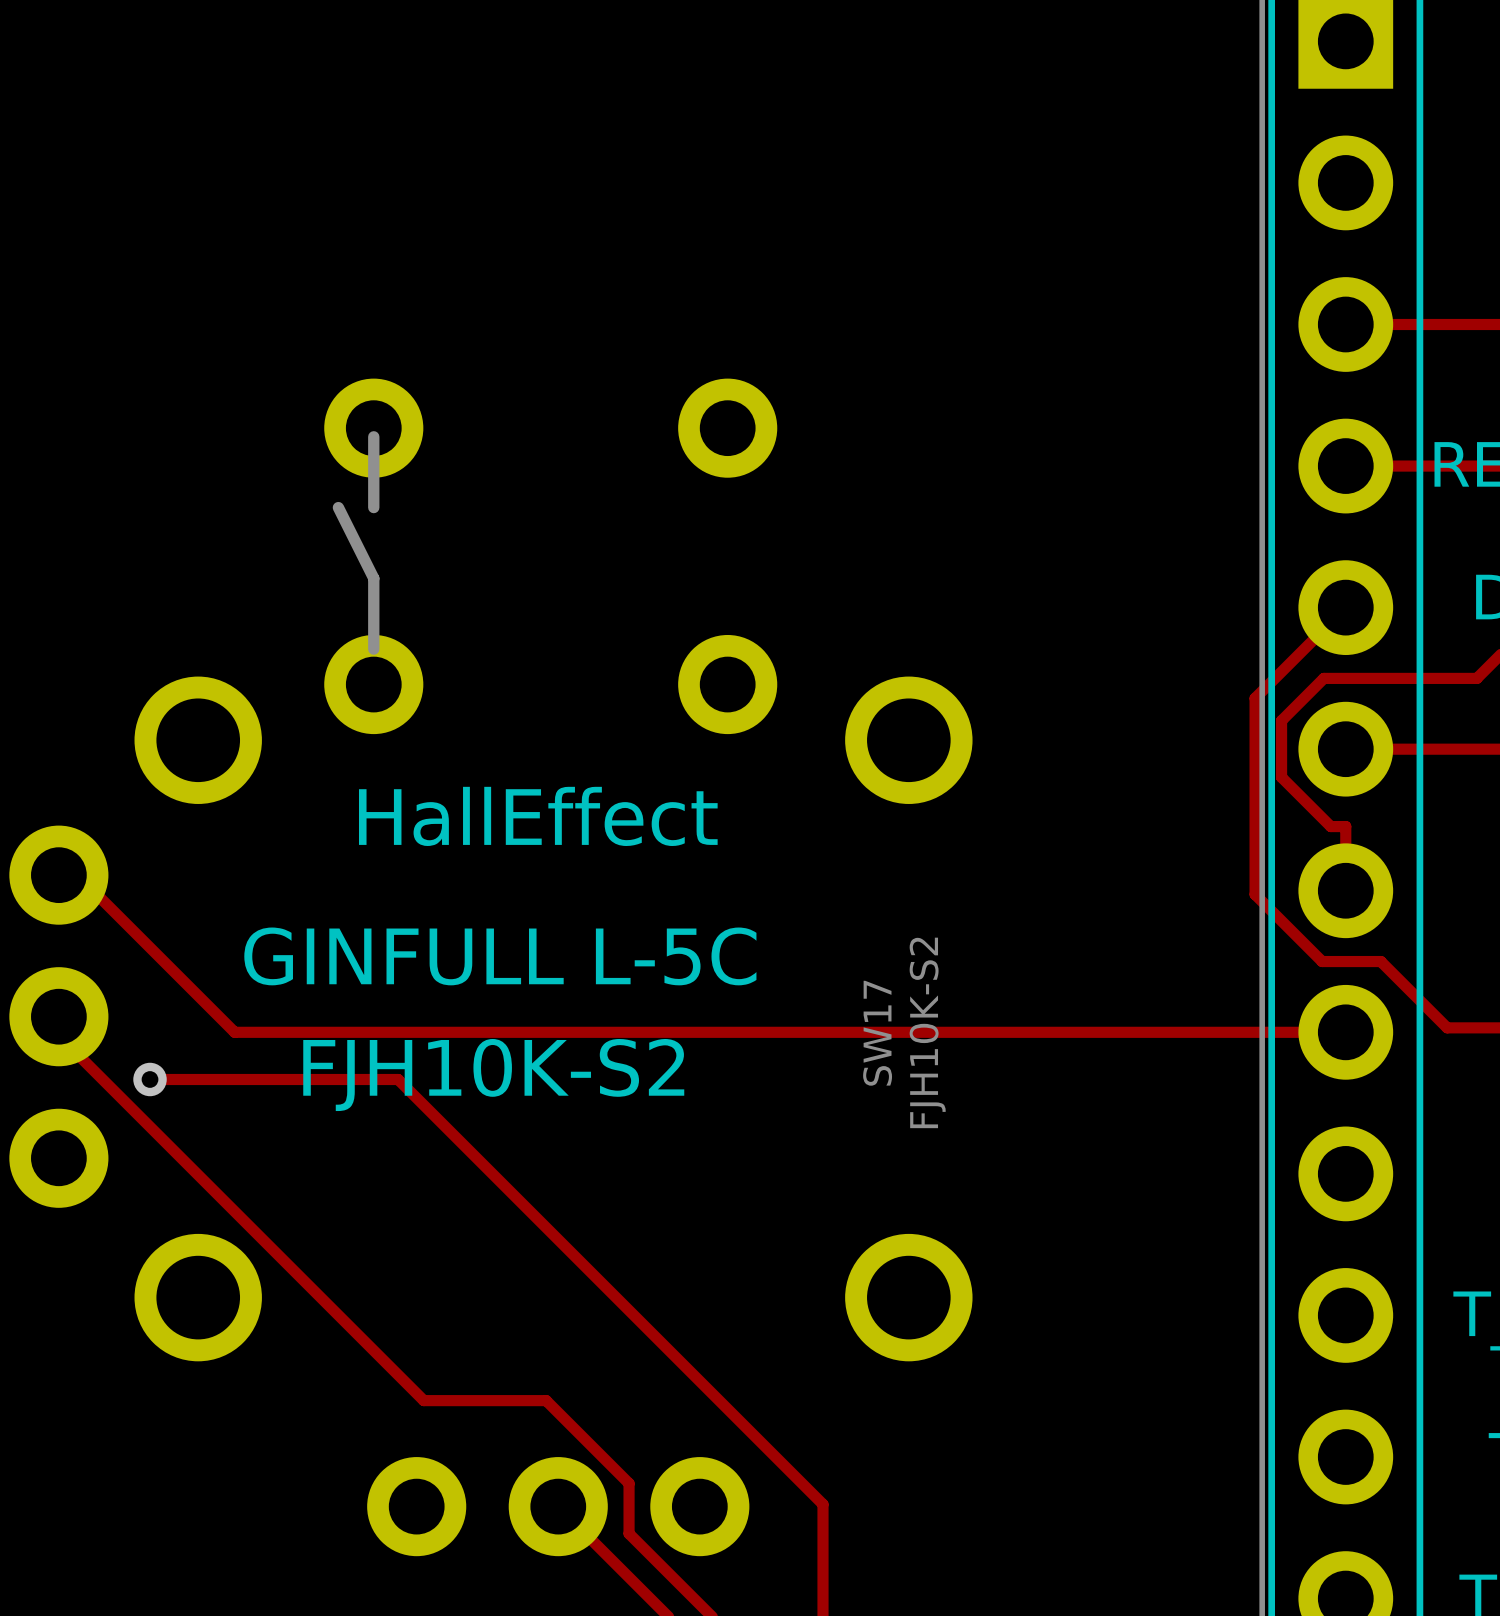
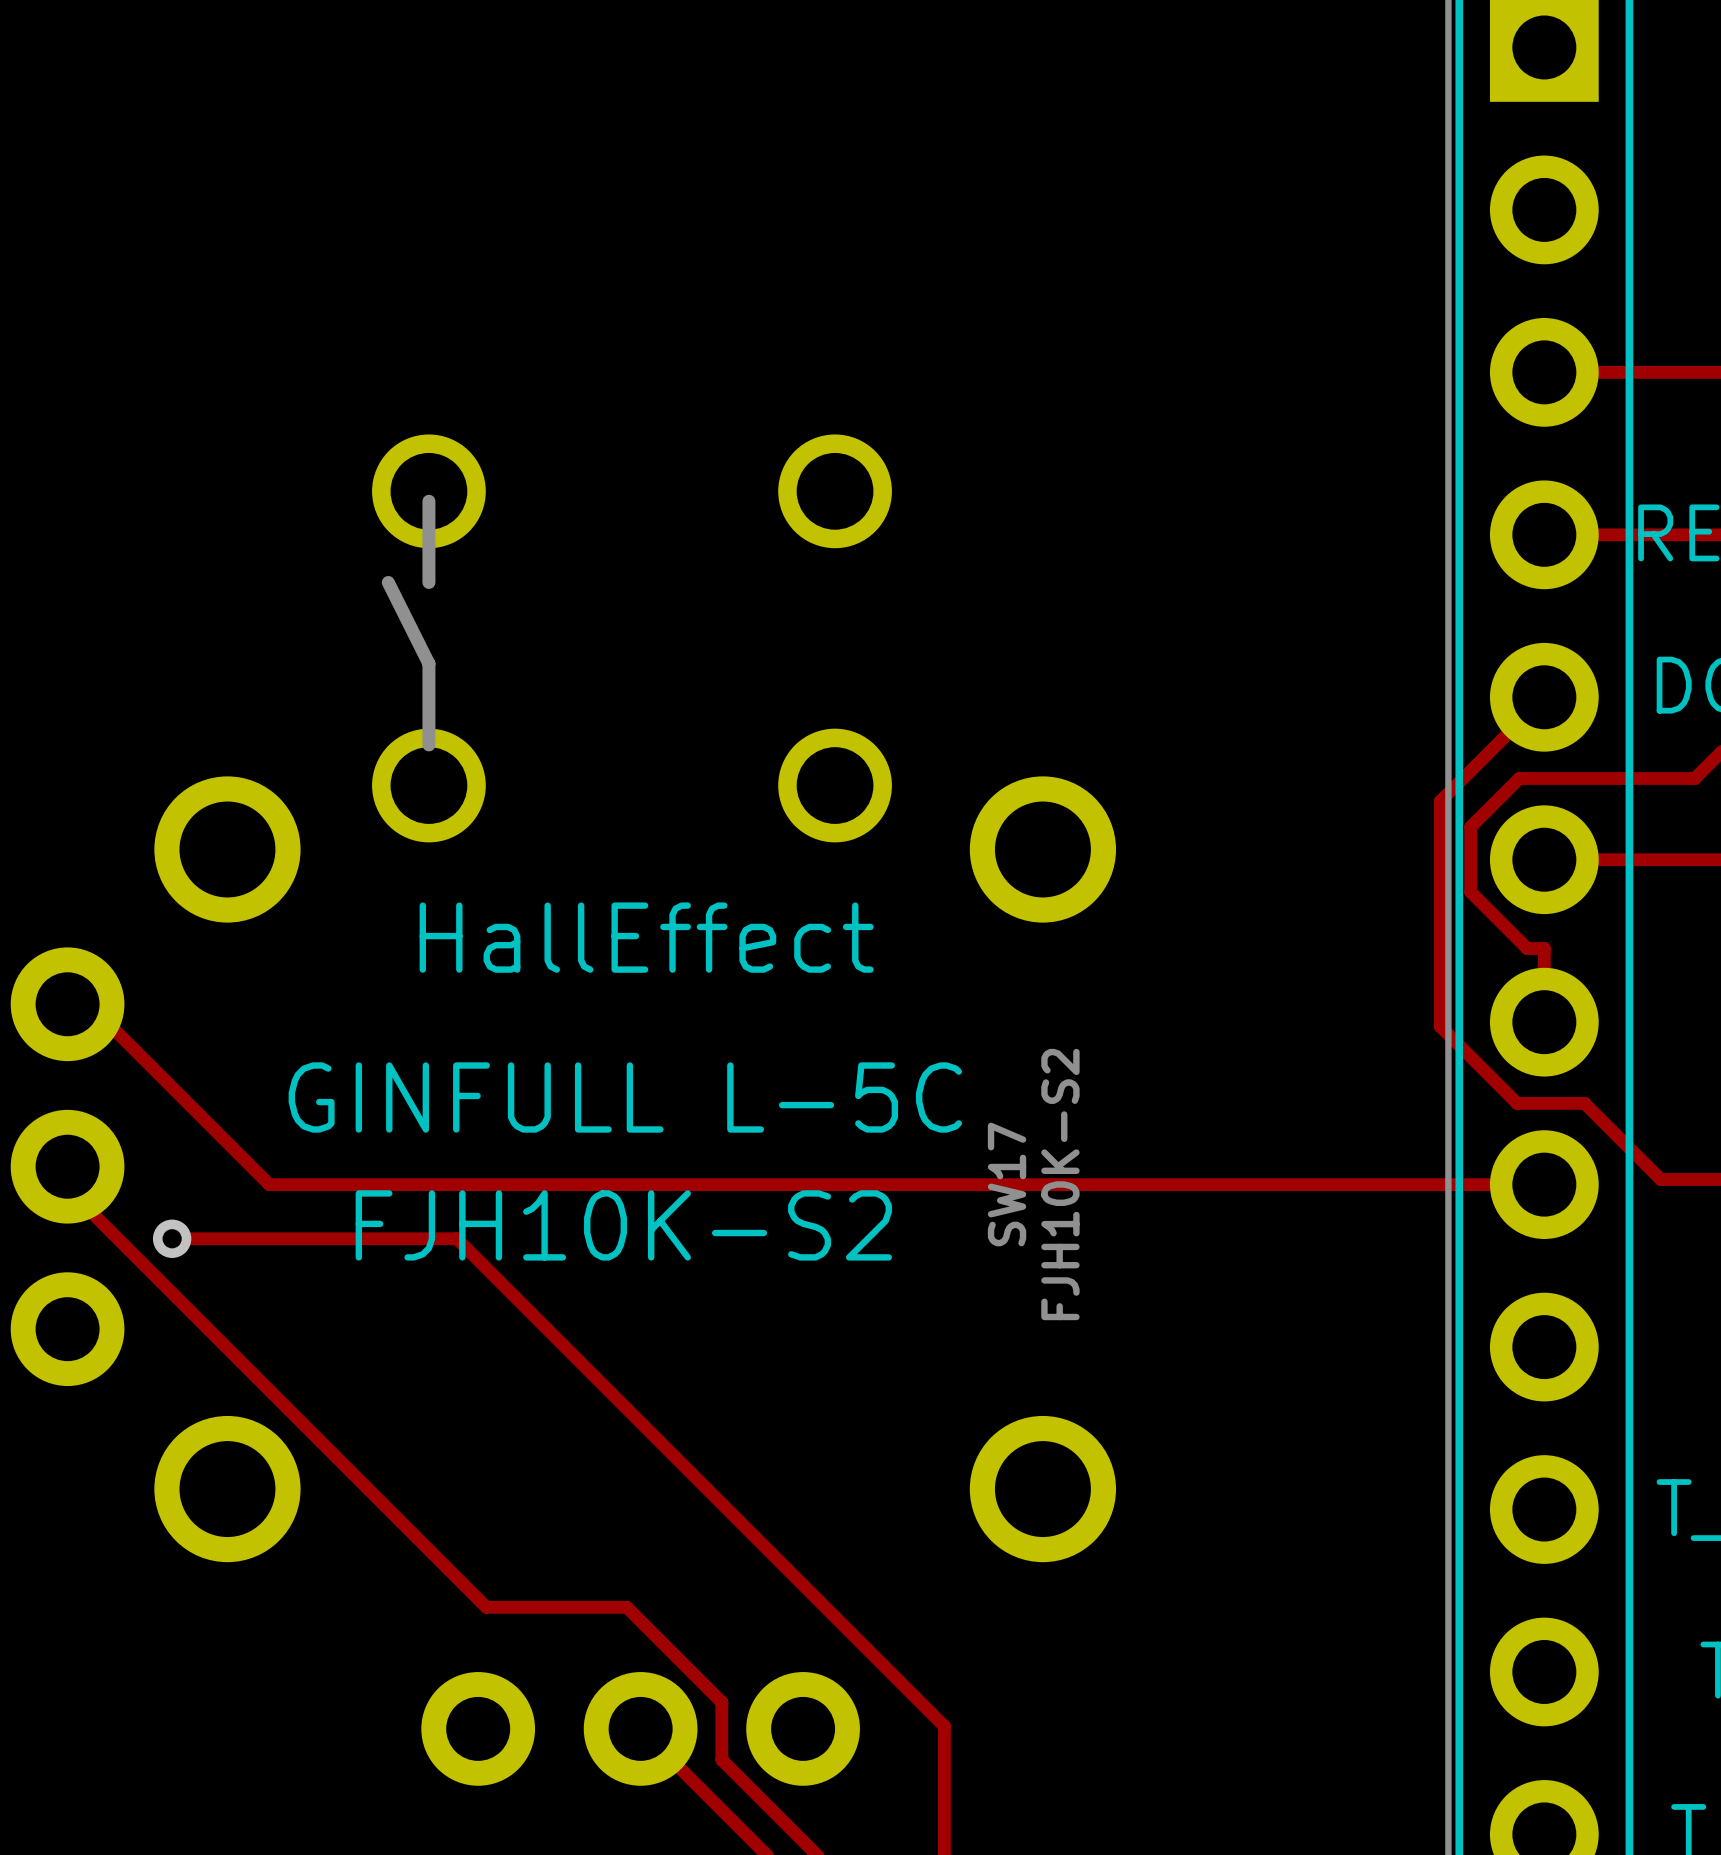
SW17 footprint: [9, 378, 973, 1557] -> [10, 434, 1117, 1786]

